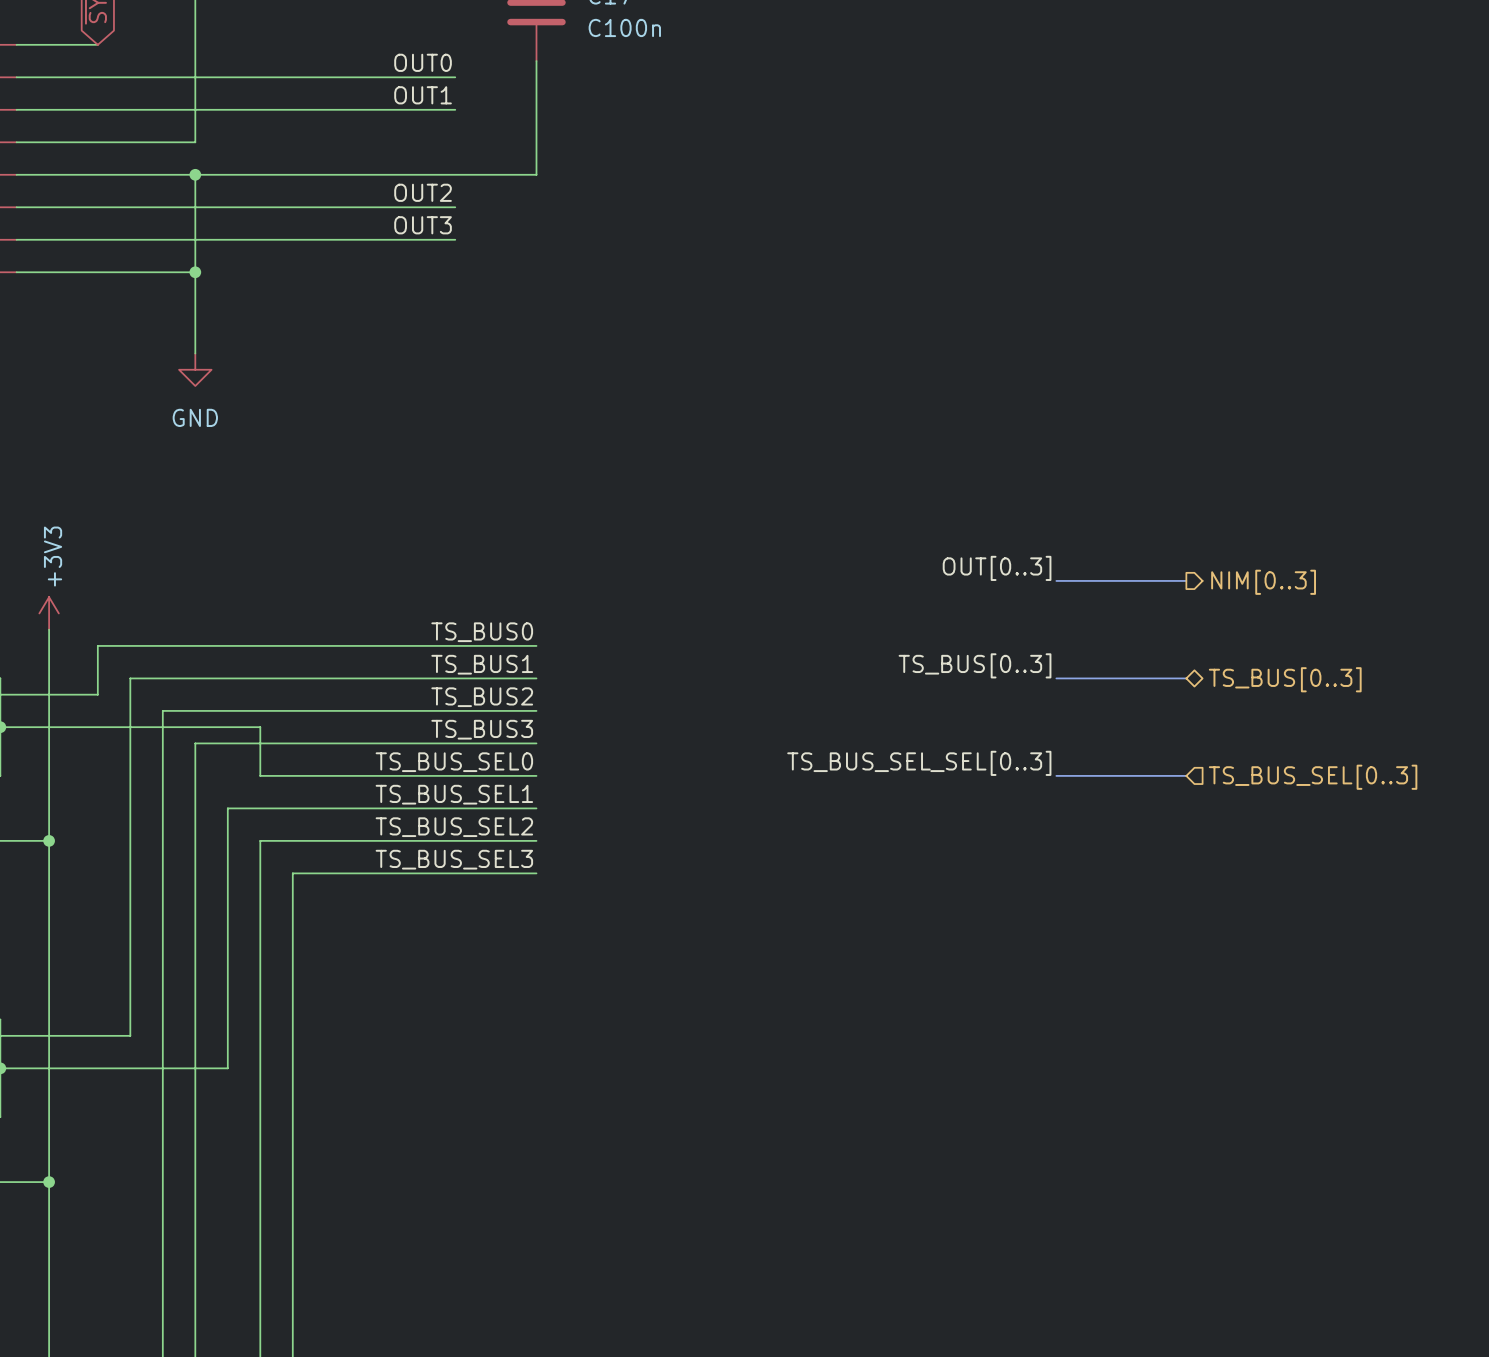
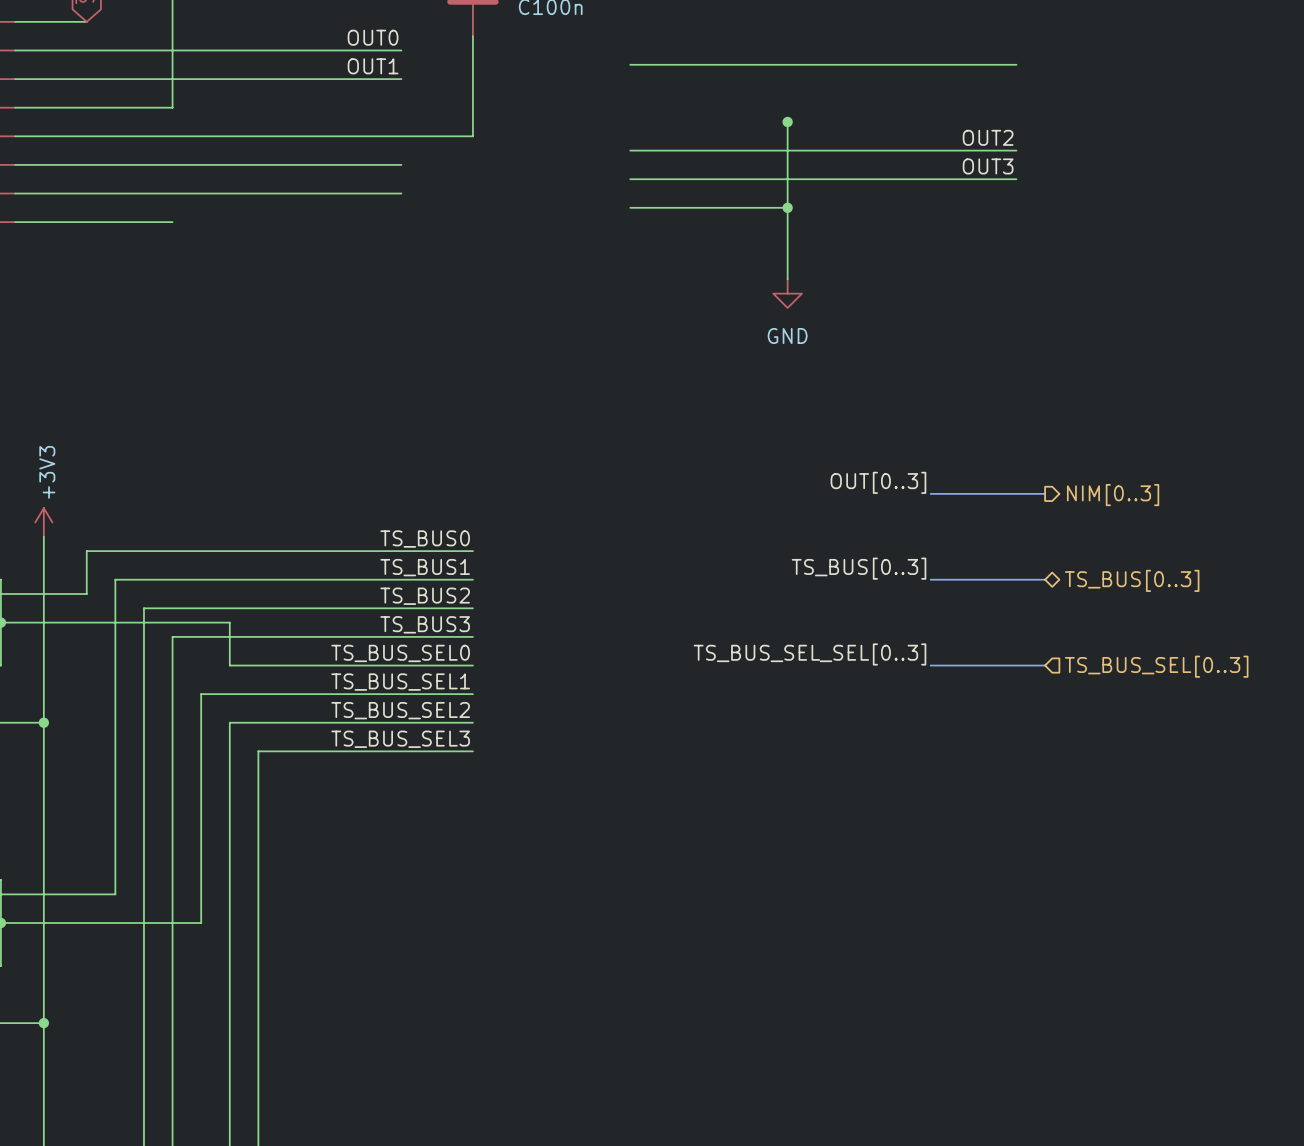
wire: none -> (630, 64) (1016, 64)
wire: none -> (787, 122) (787, 279)
junction: none -> (787, 122)
wire: (195, 174) (195, 353) -> none
junction: (195, 174) -> none
label: none -> OUT2 (988, 137)
wire: none -> (630, 150) (1016, 150)
label: OUT2 (423, 192) -> none
label: none -> OUT3 (988, 166)
wire: none -> (630, 179) (1016, 179)
label: OUT3 (423, 225) -> none
wire: none -> (630, 207) (787, 207)
junction: none -> (787, 207)
junction: (195, 272) -> none
power symbol: none -> GND (787, 293)
power symbol: GND (195, 369) -> none

